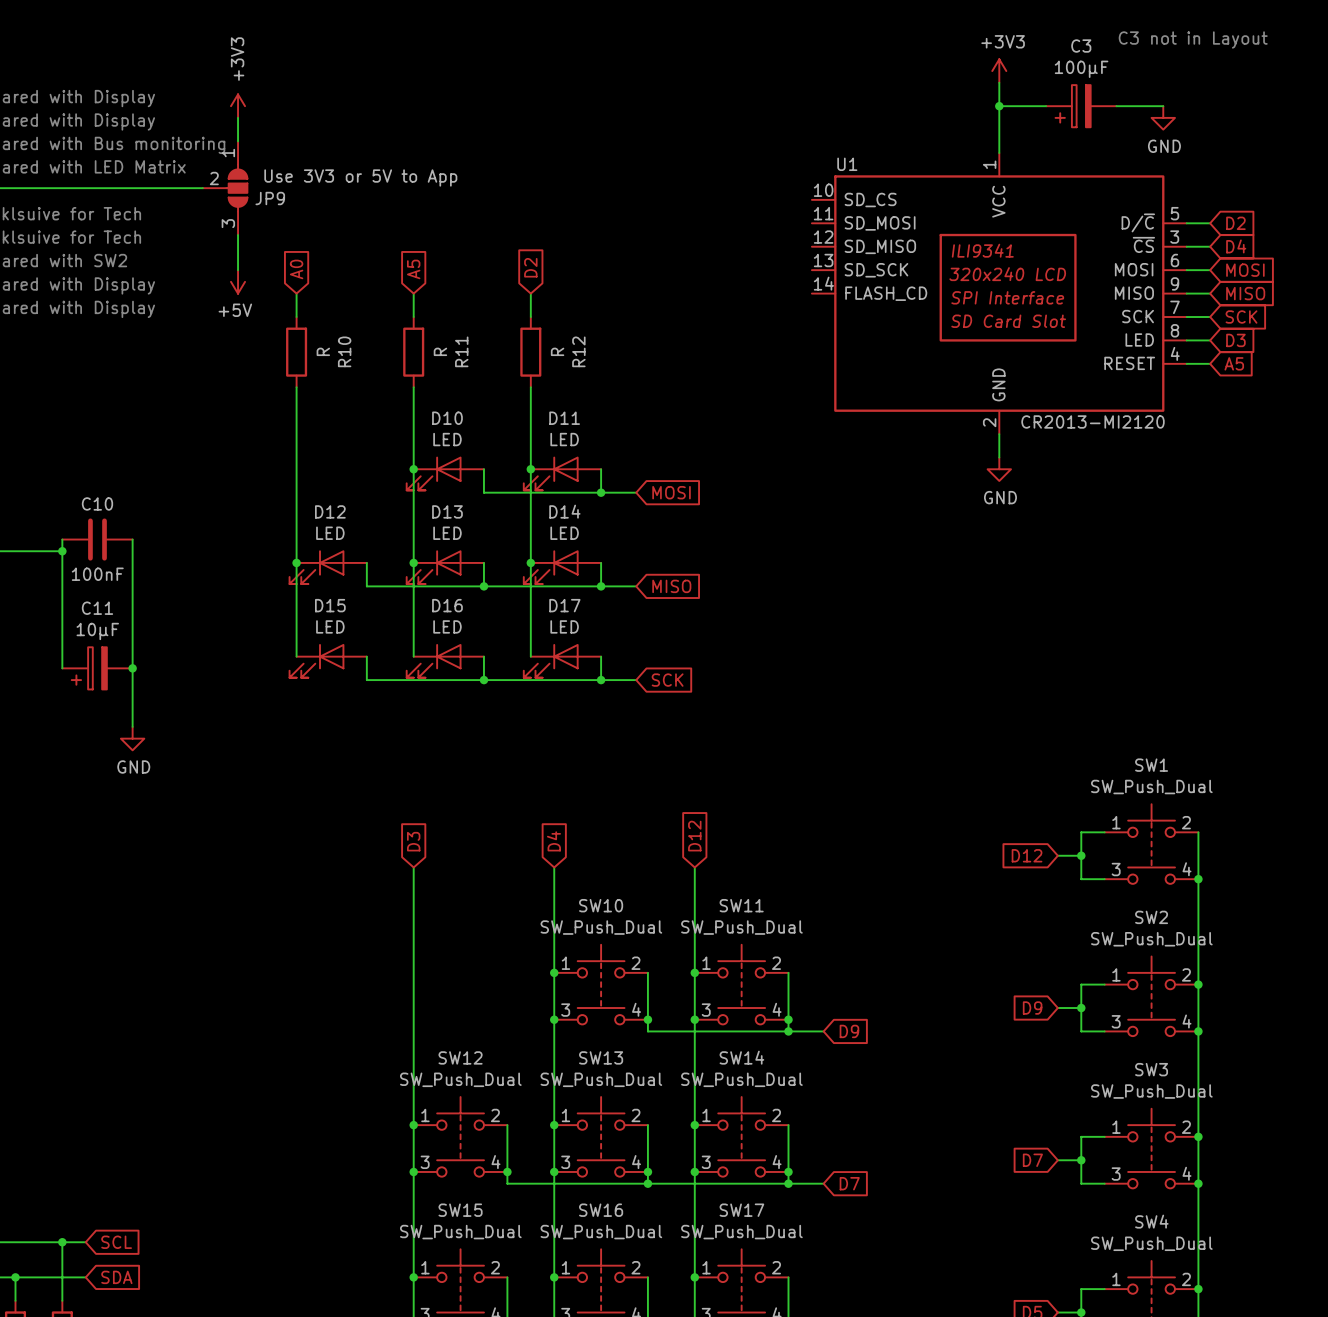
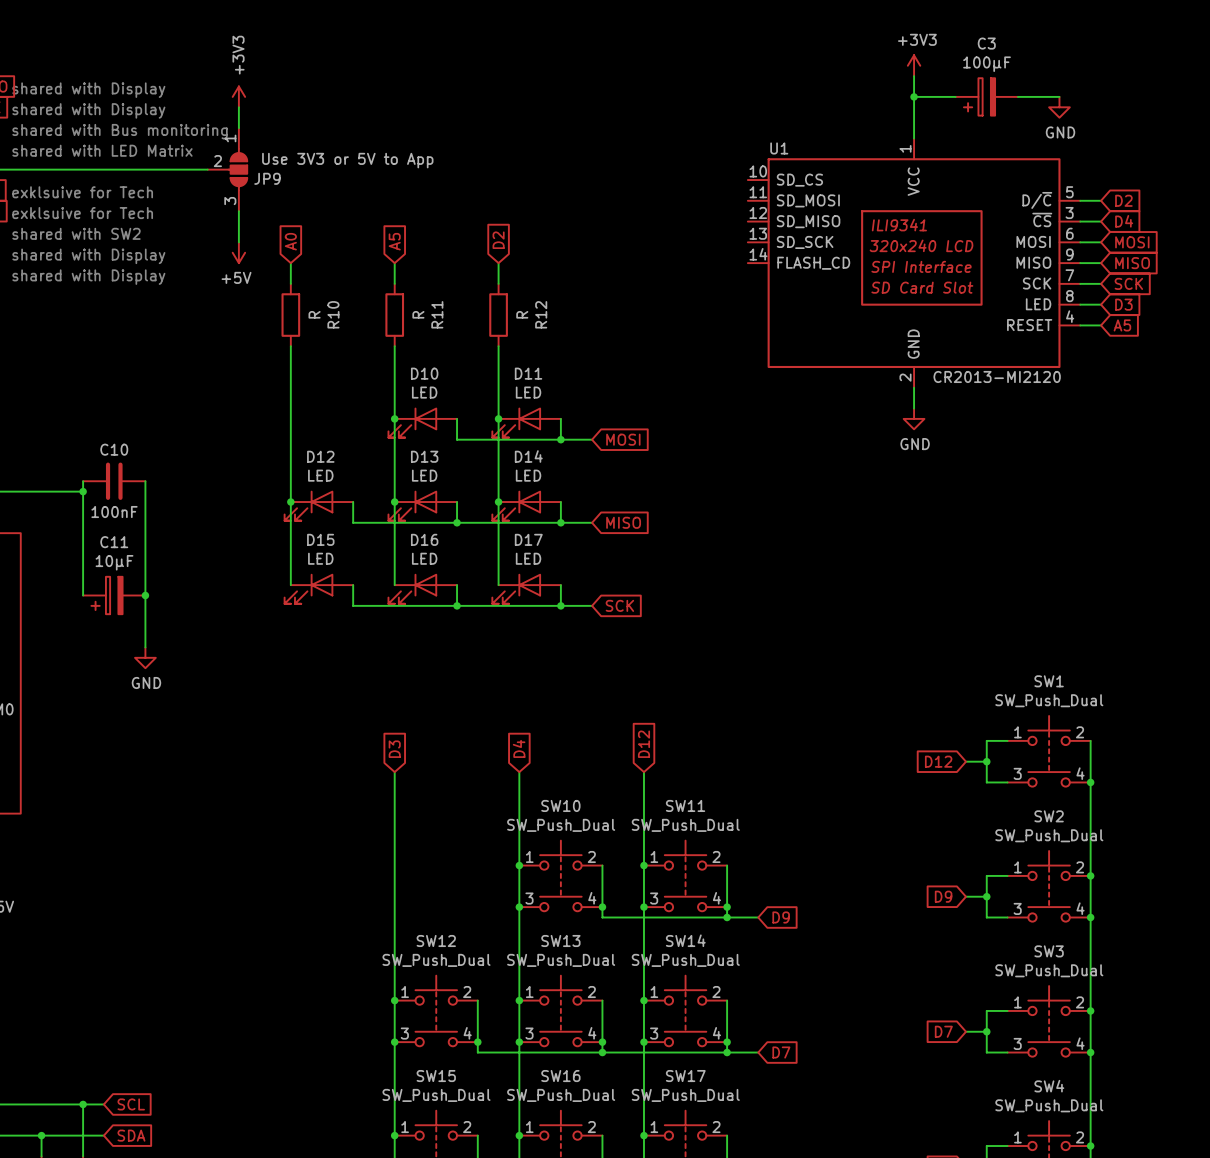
text: C3 not in Layout (1193, 39) -> none

